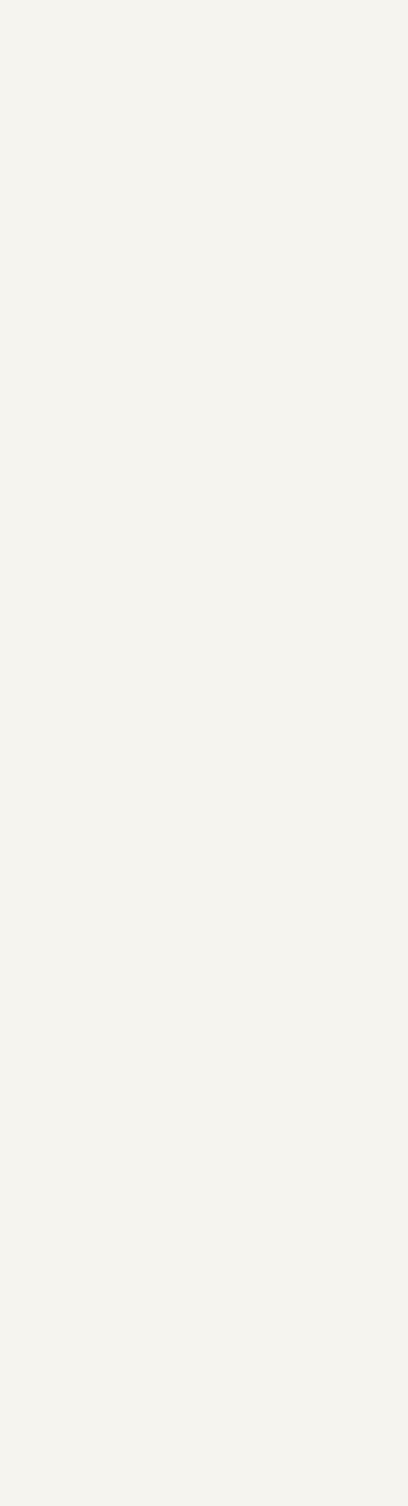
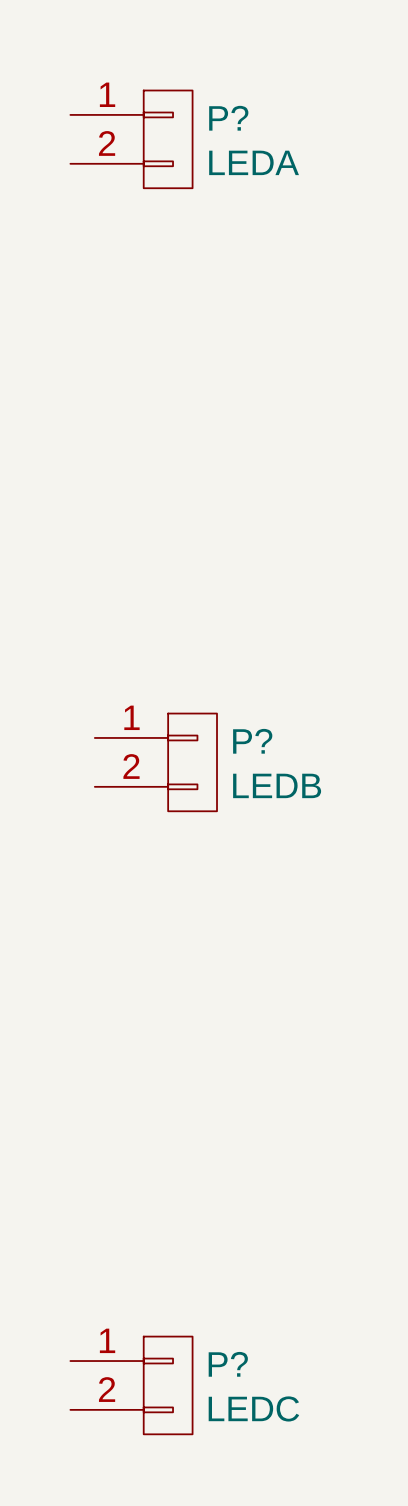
P?: none -> LEDA (131, 139)
P?: none -> LEDB (155, 762)
P?: none -> LEDC (131, 1385)

